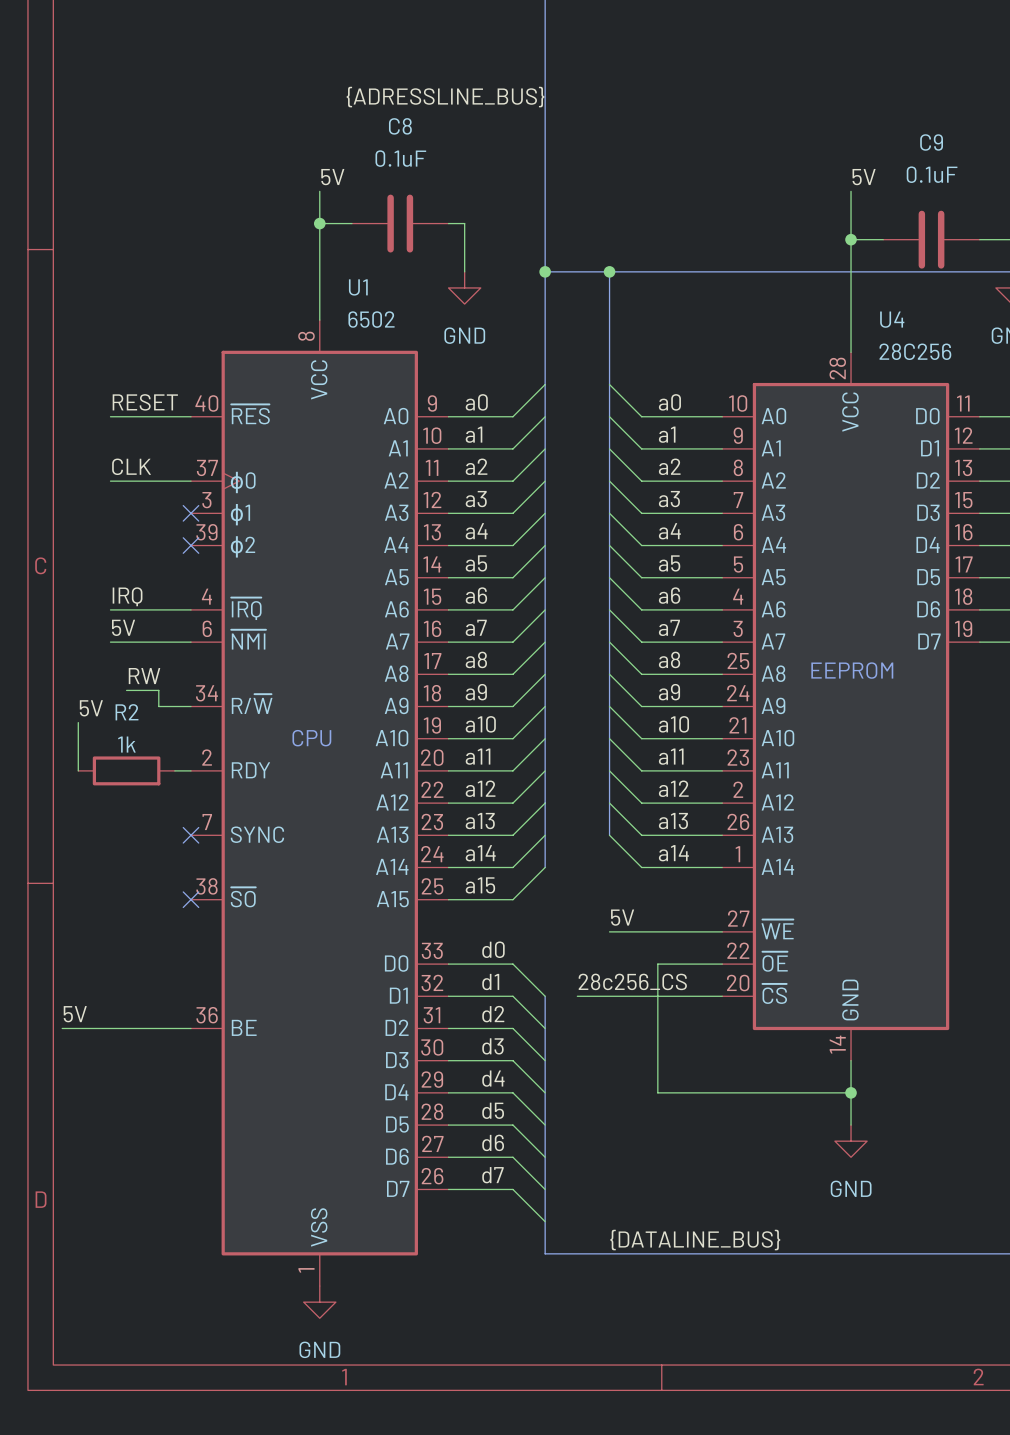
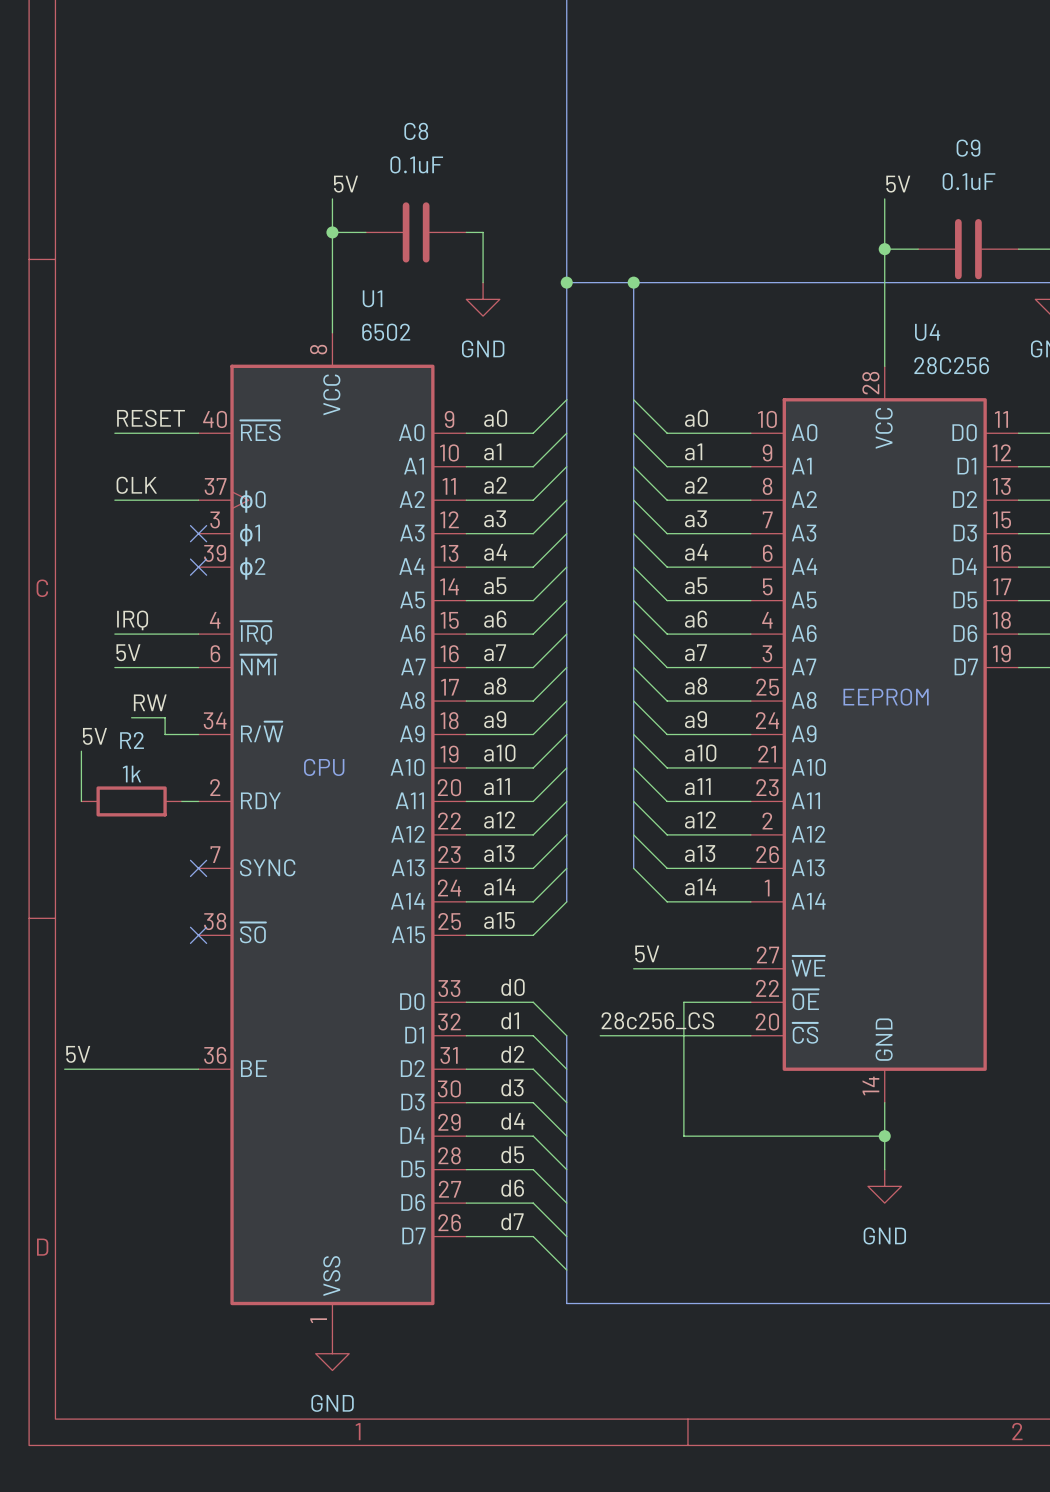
label: {ADRESSLINE_BUS} (445, 97) -> none
label: {DATALINE_BUS} (695, 1240) -> none

